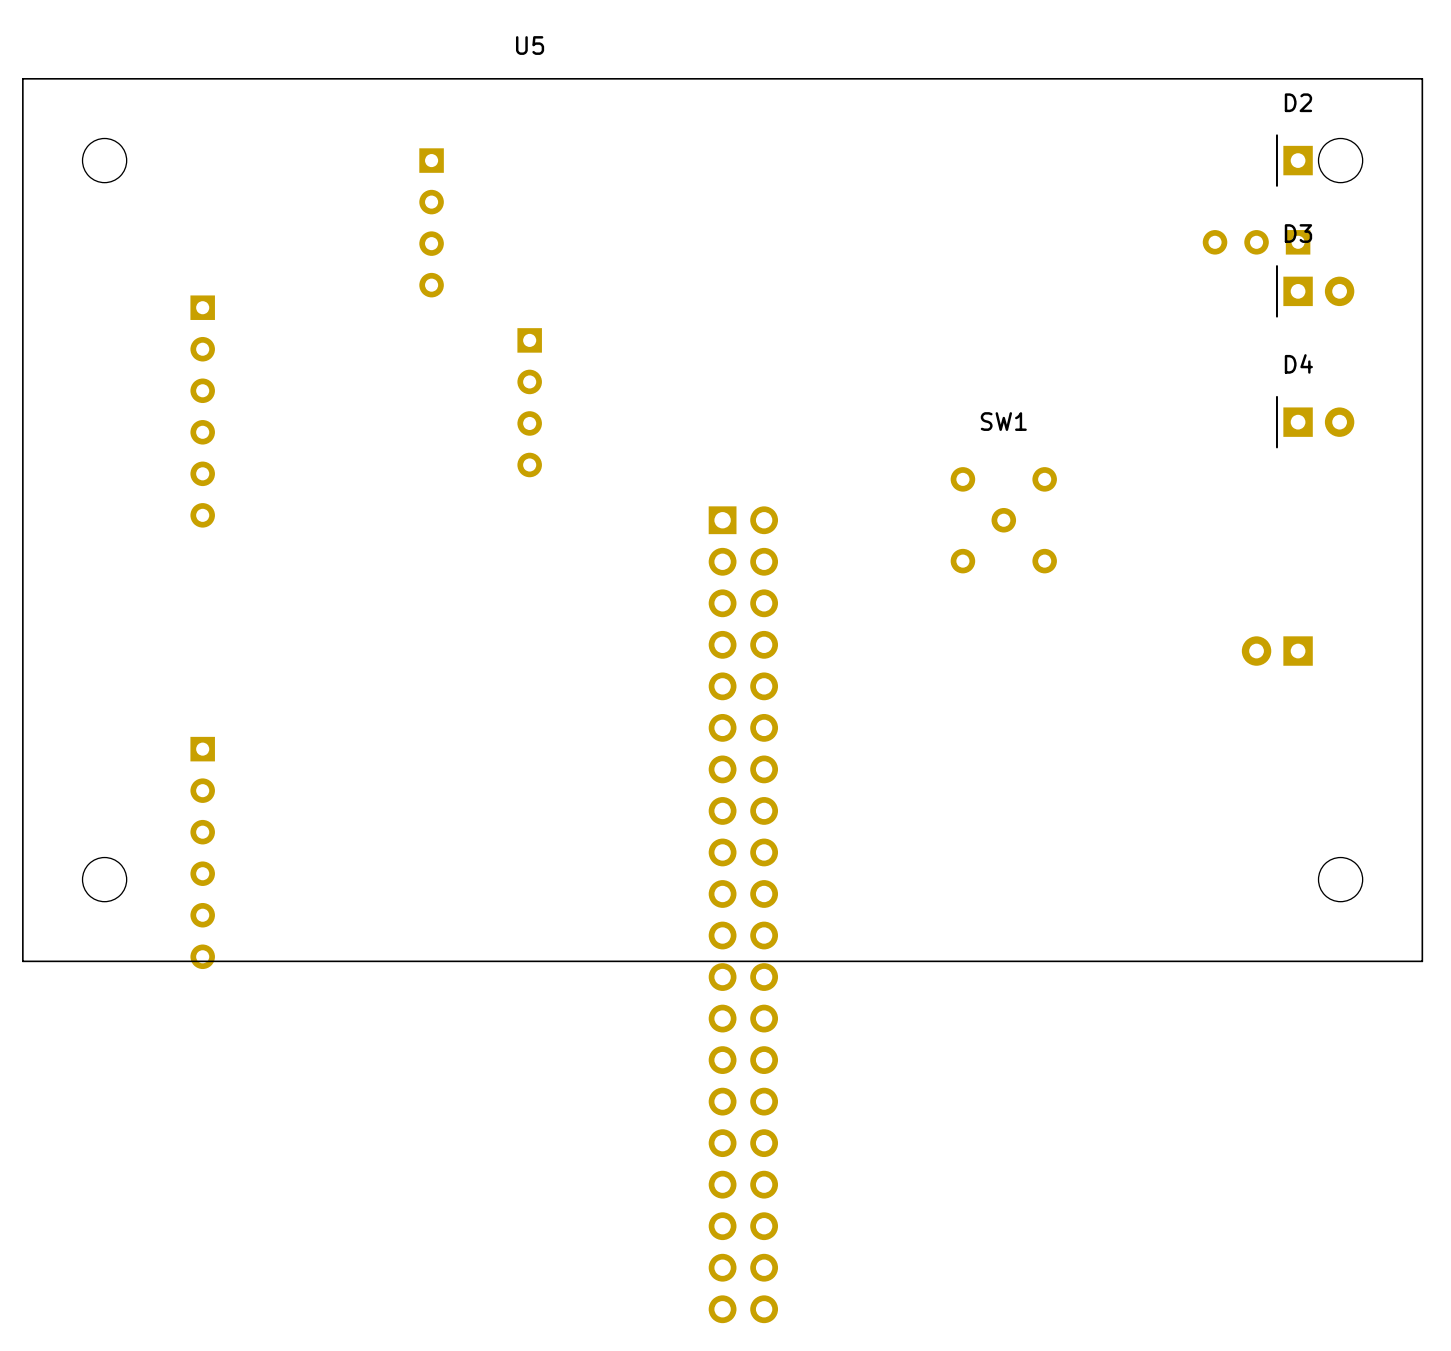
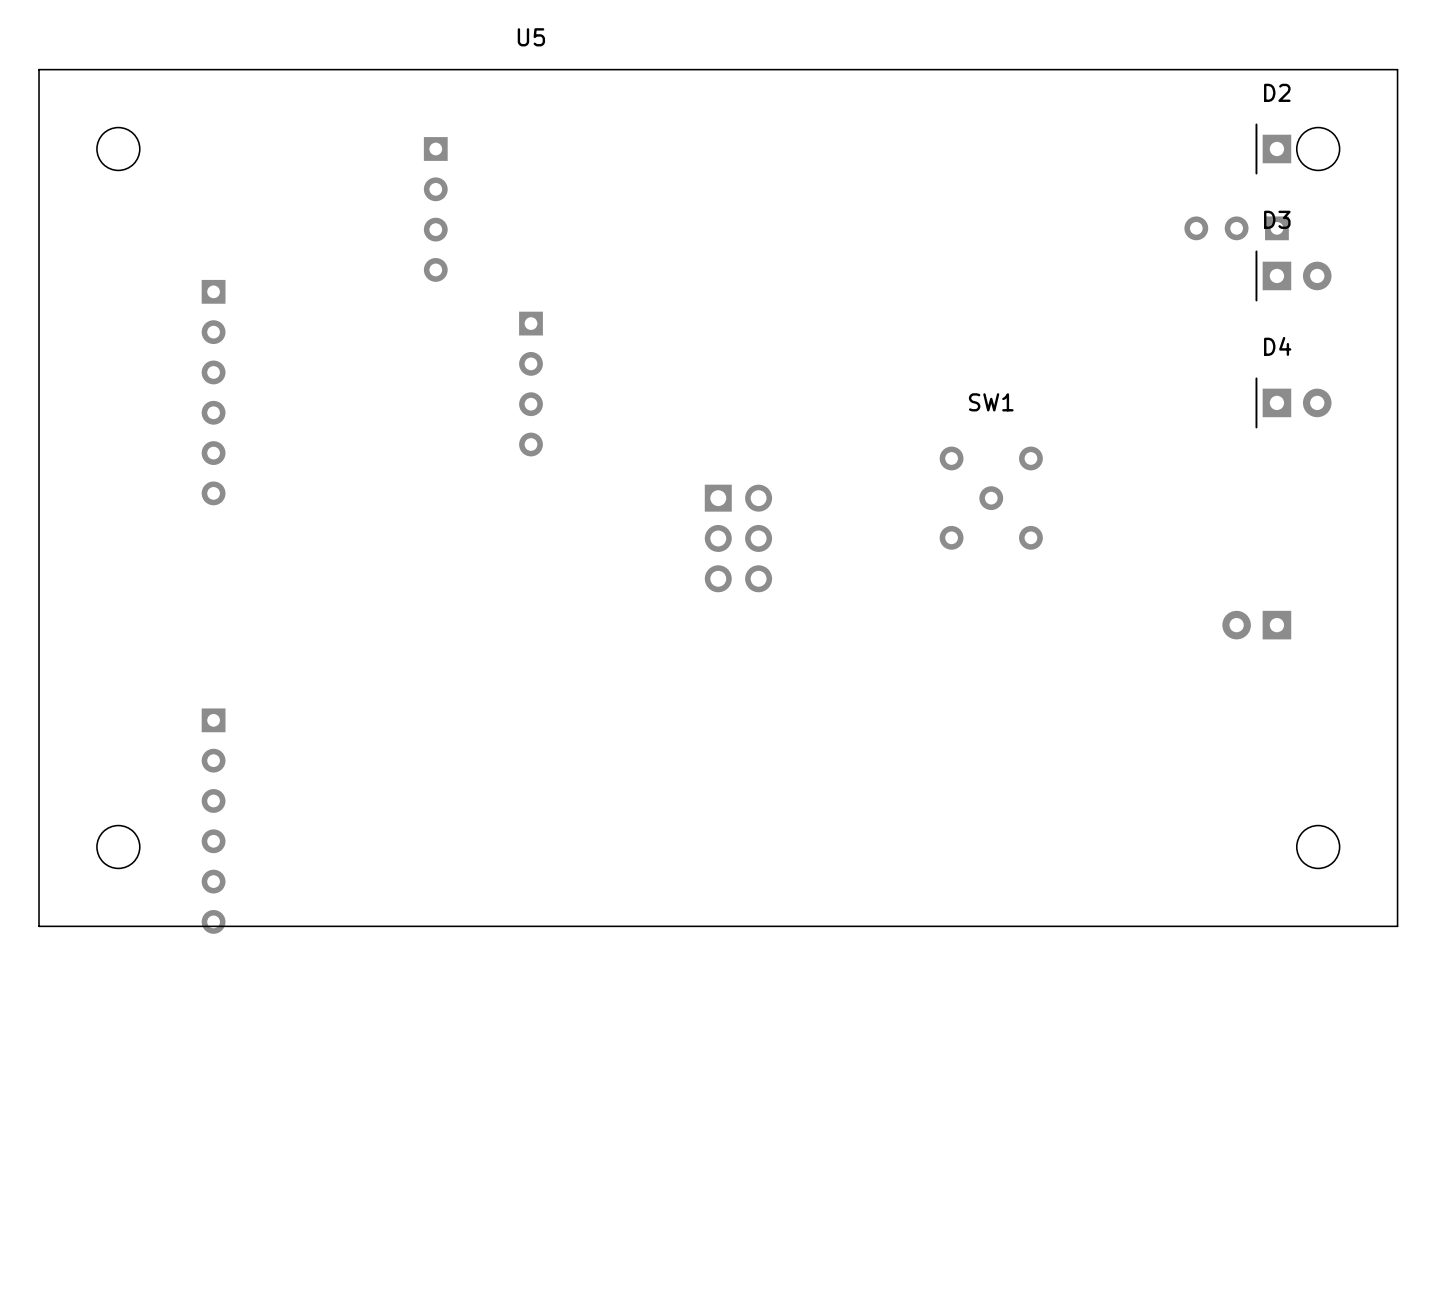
part: (743, 914) -> none

